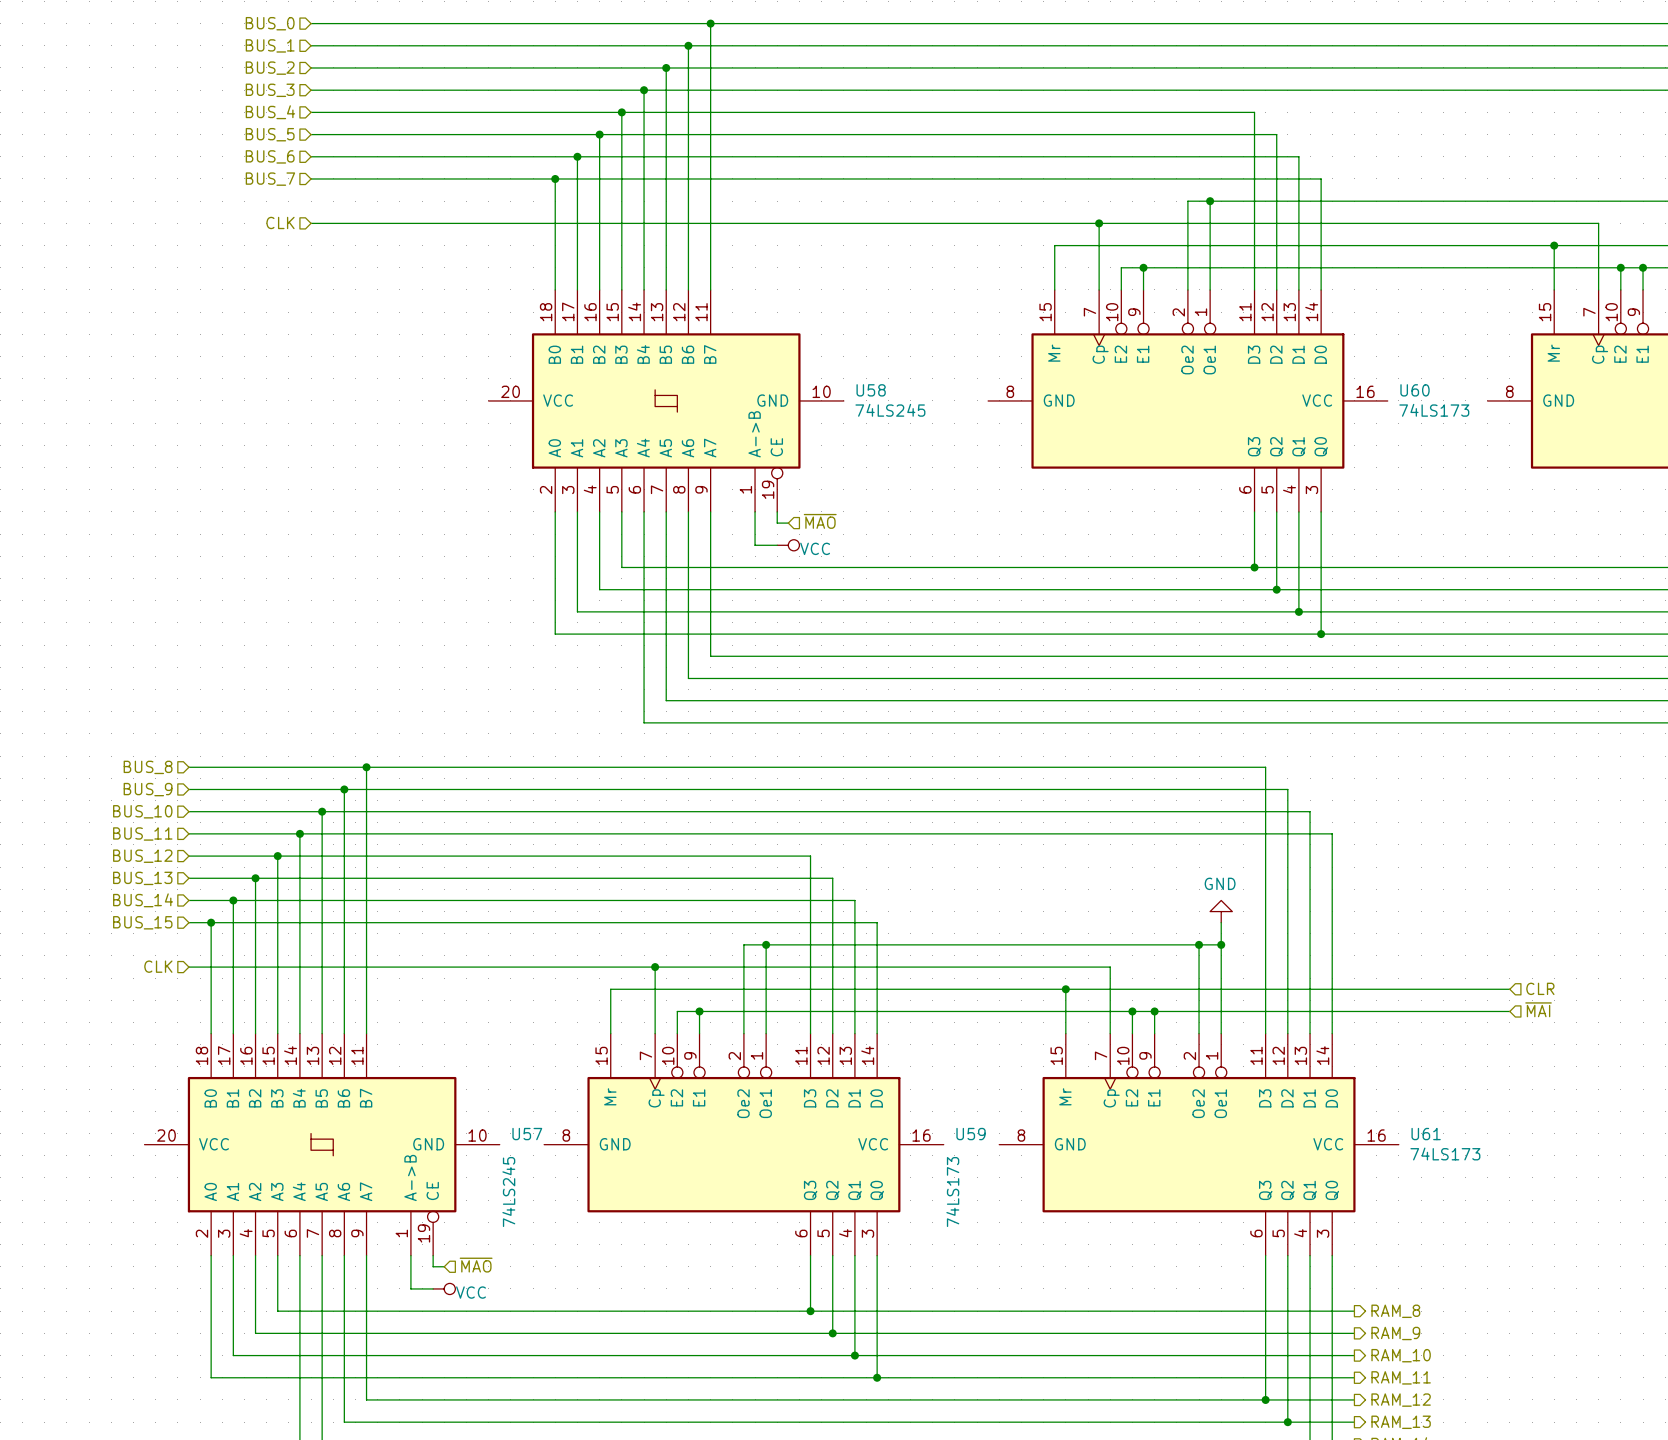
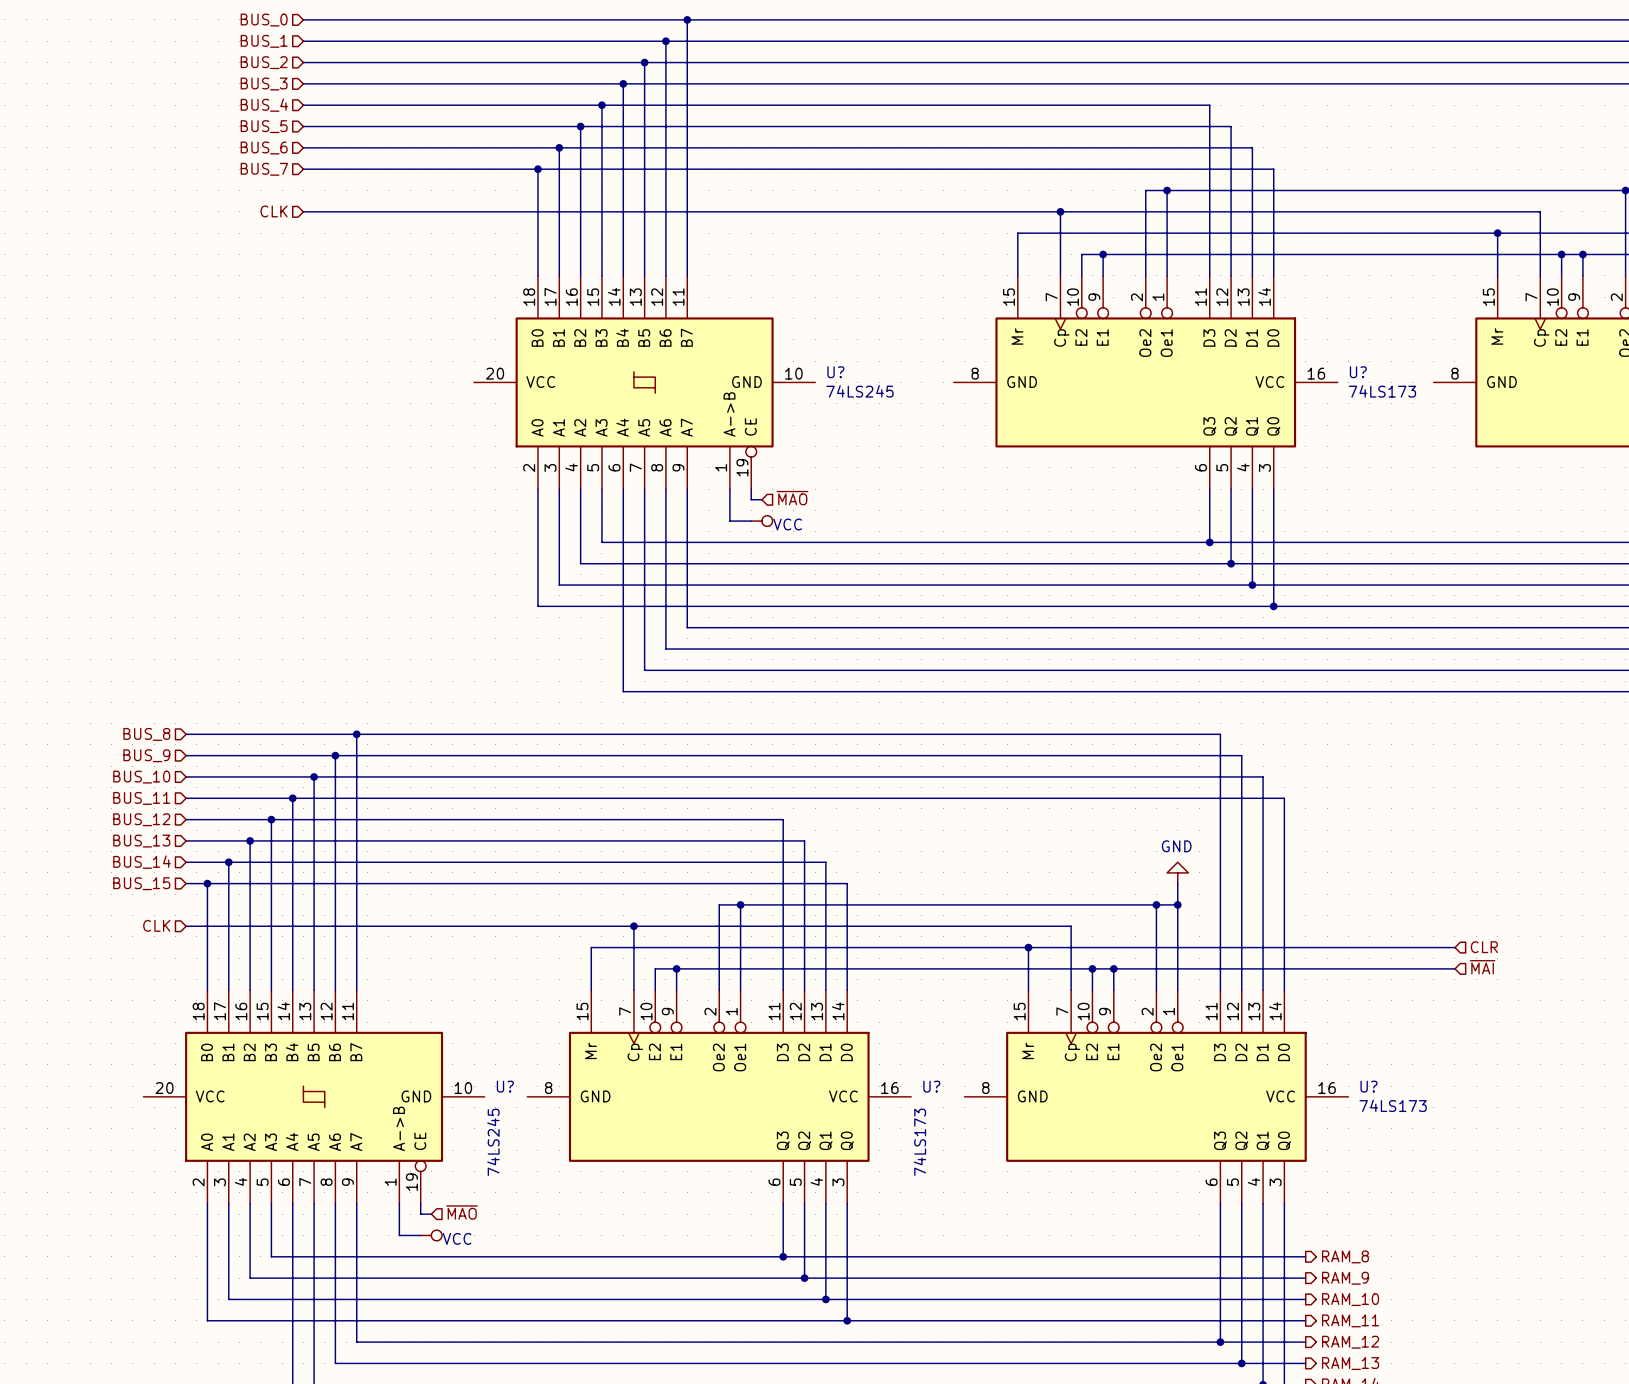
U58 name: U58 (871, 390) -> U? (835, 372)
U60 name: U60 (1415, 390) -> U? (1358, 372)
U57 name: U57 (527, 1134) -> U? (505, 1086)
U59 name: U59 (971, 1134) -> U? (931, 1086)
U61 name: U61 (1426, 1134) -> U? (1368, 1086)

